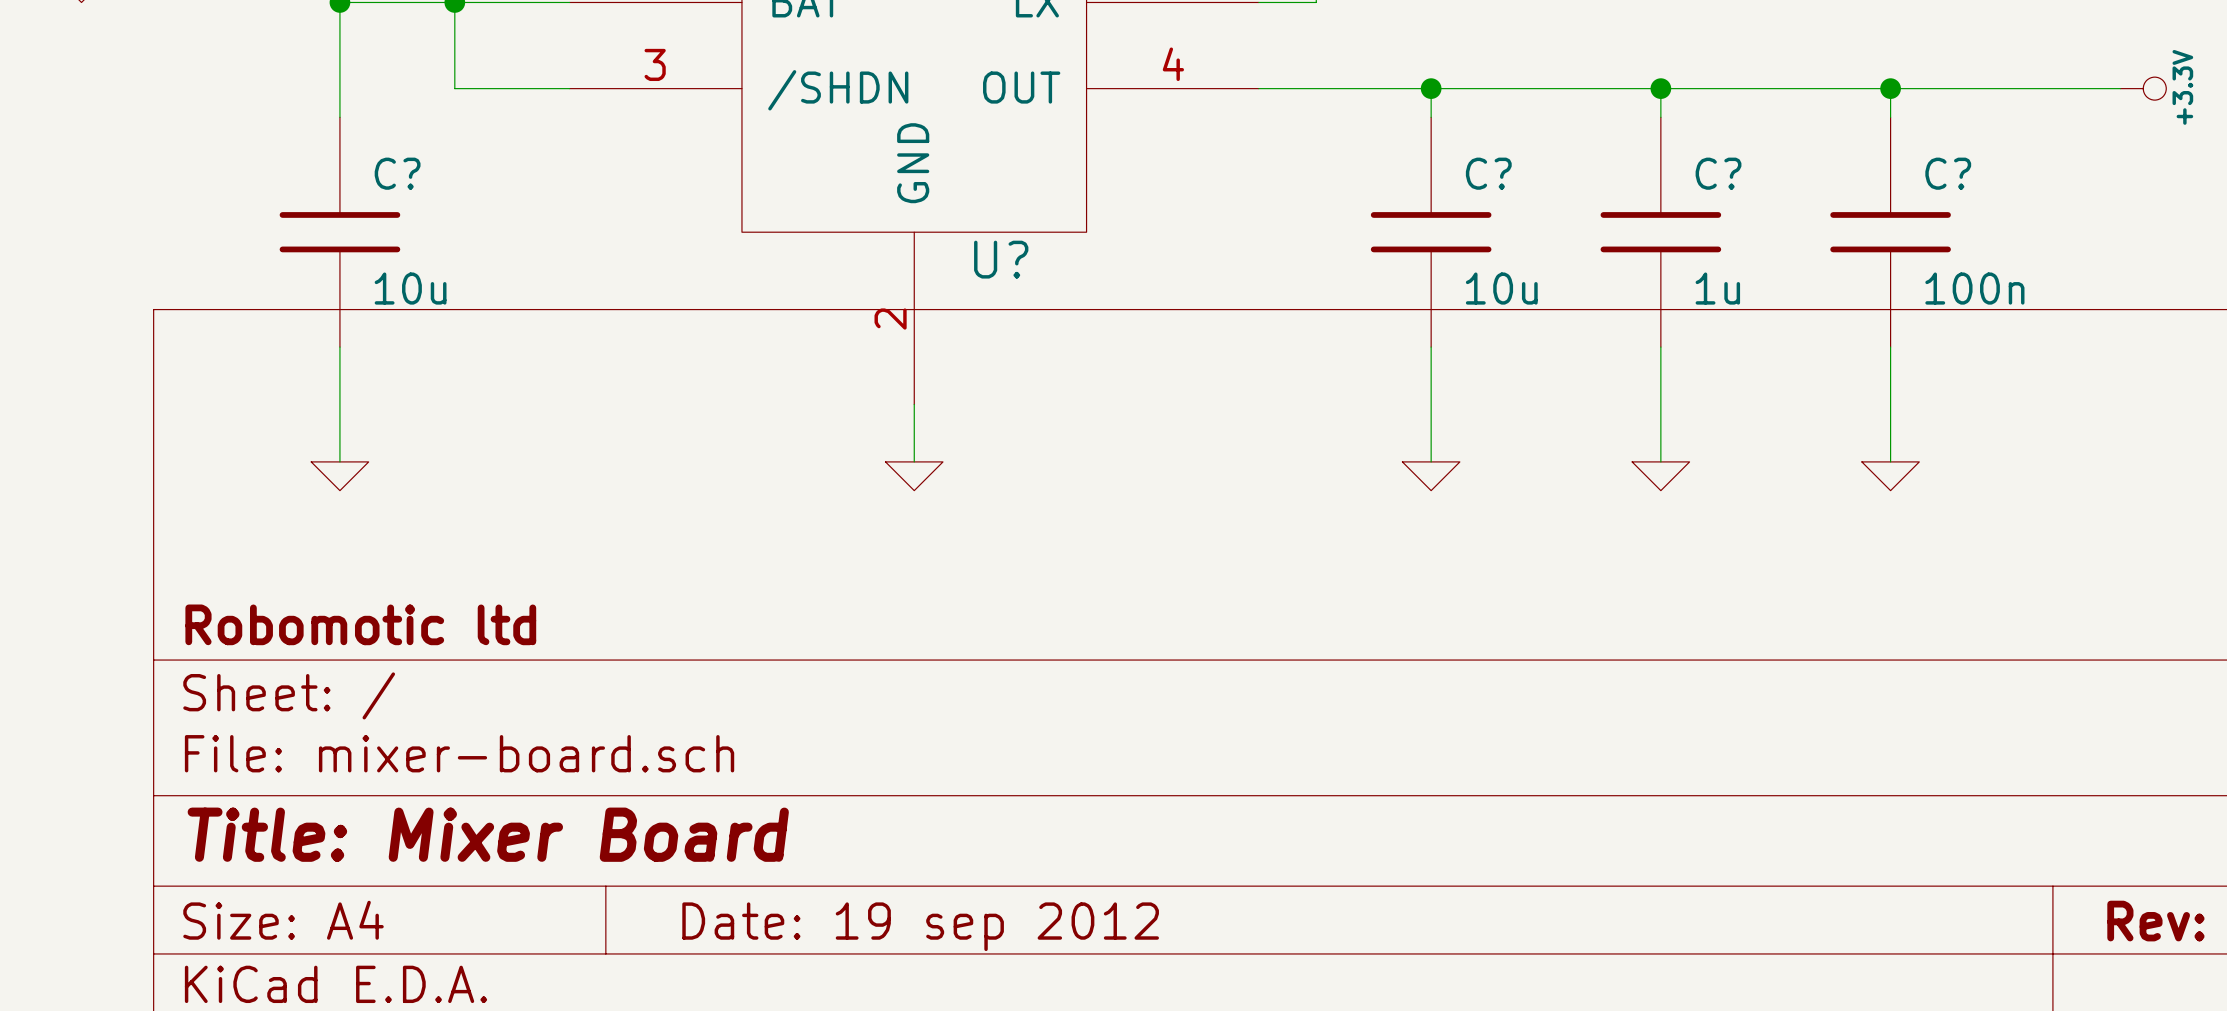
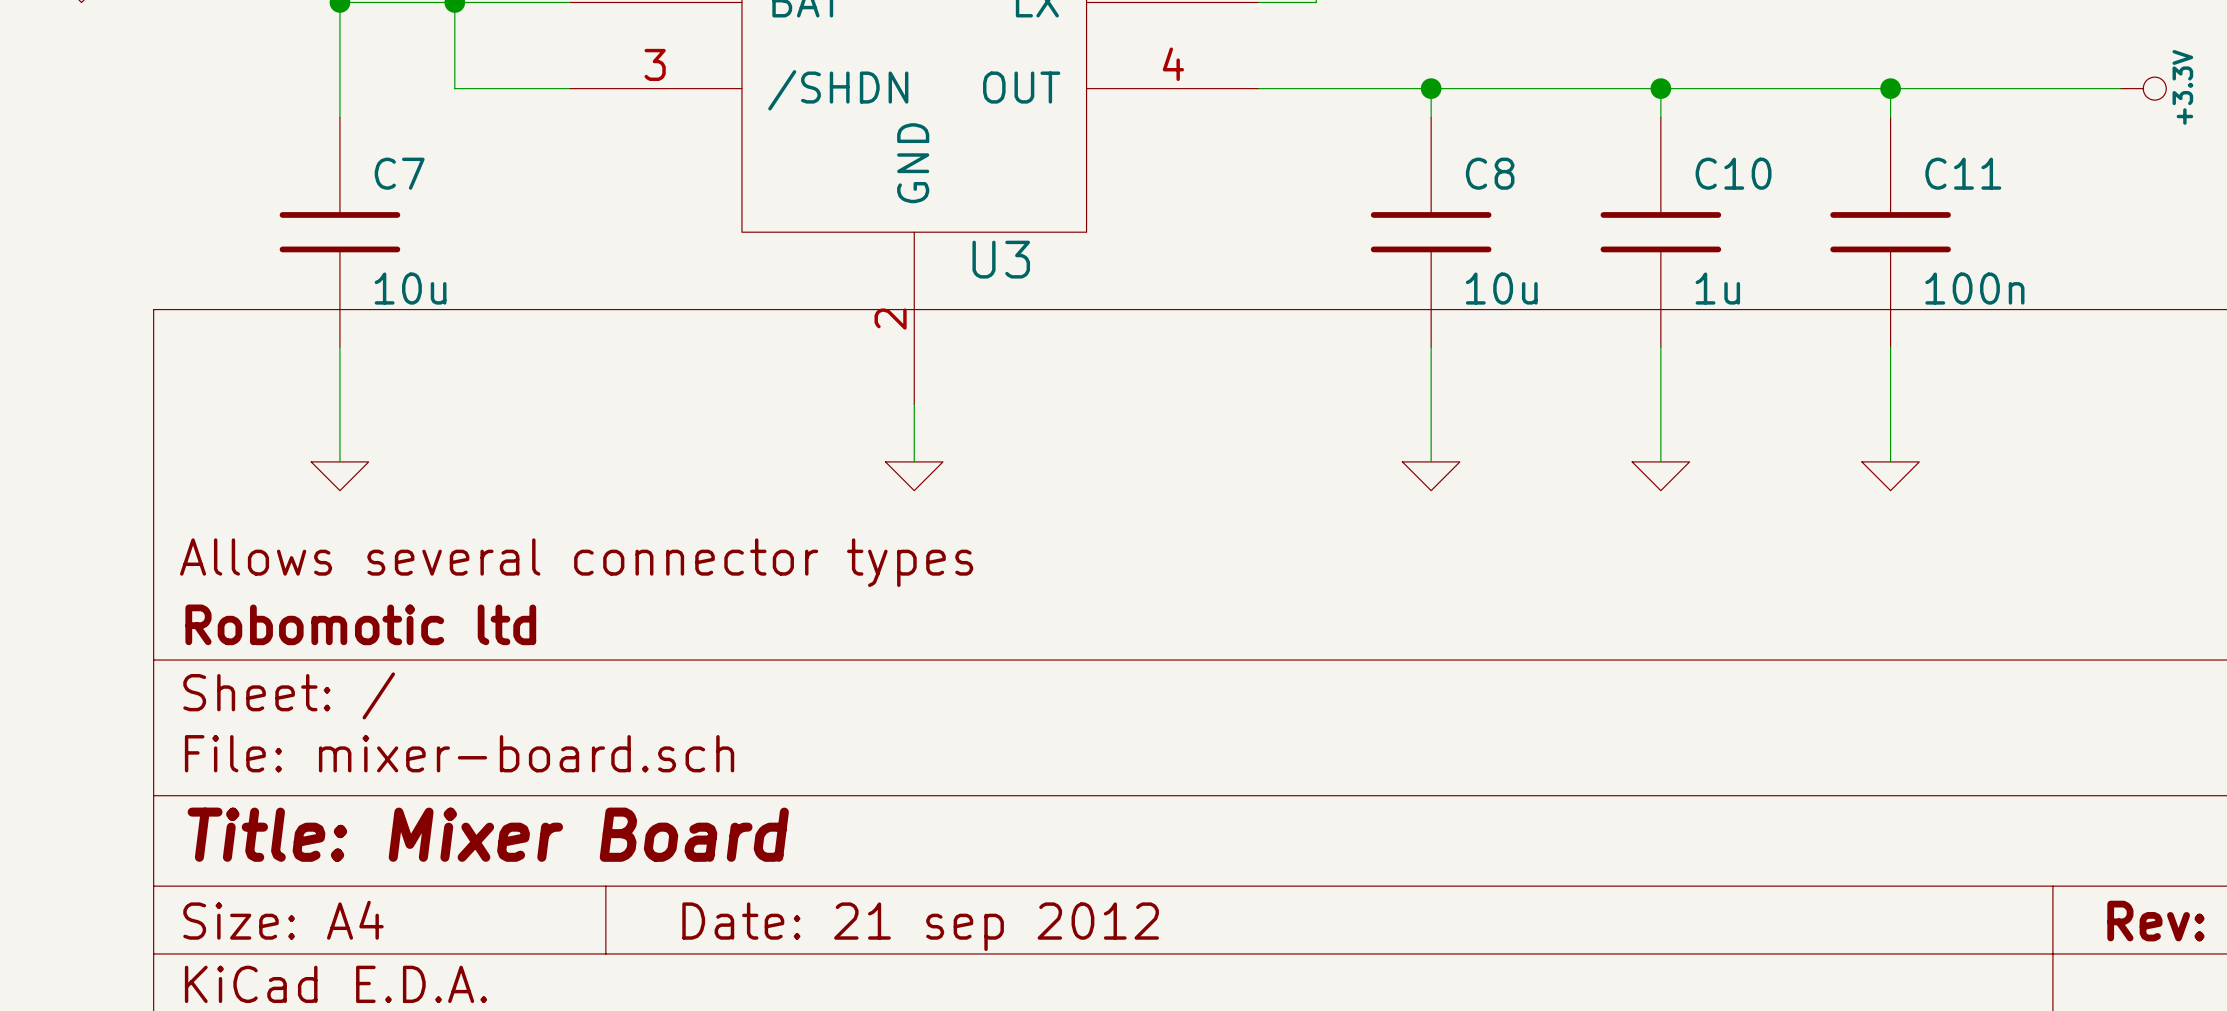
C? name: C? (397, 173) -> C7 (399, 173)
C? name: C? (1488, 173) -> C8 (1490, 173)
C? name: C? (1718, 173) -> C10 (1733, 173)
C? name: C? (1948, 173) -> C11 (1963, 173)
U? name: U? (1001, 259) -> U3 (1001, 259)
title block: none -> Allows several connector types (576, 562)
title block: Date: 19 sep 2012 (920, 926) -> Date: 21 sep 2012 (920, 926)

